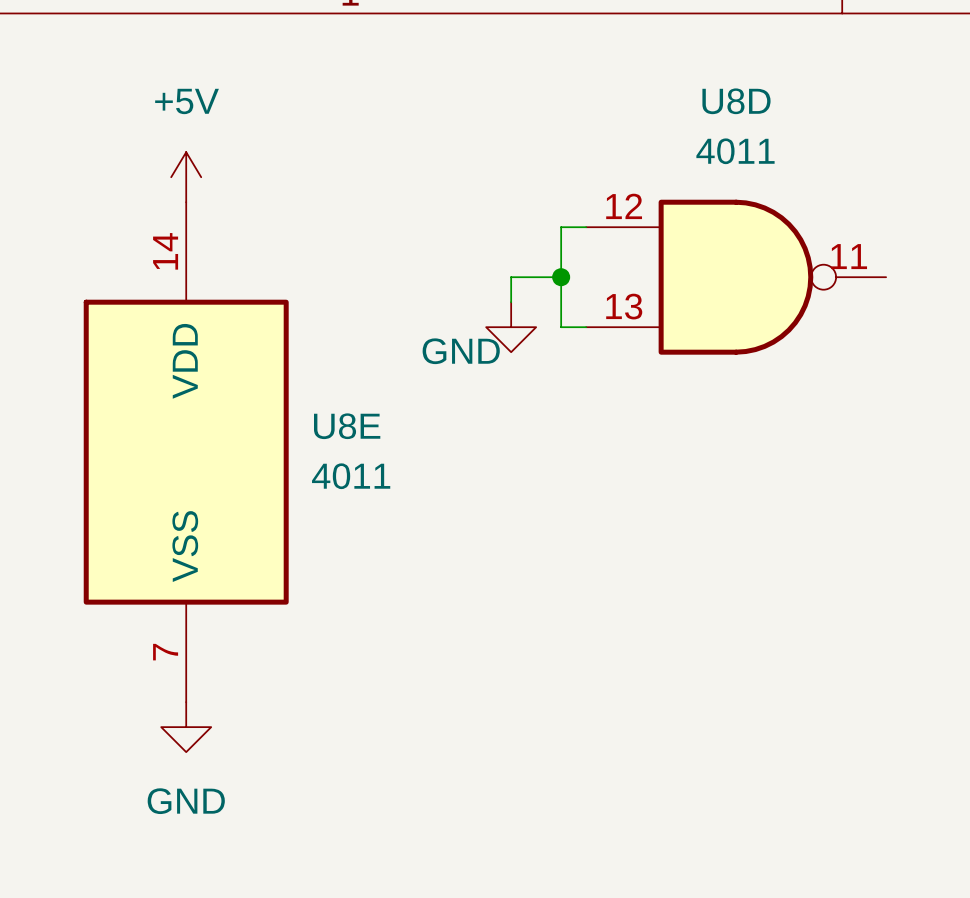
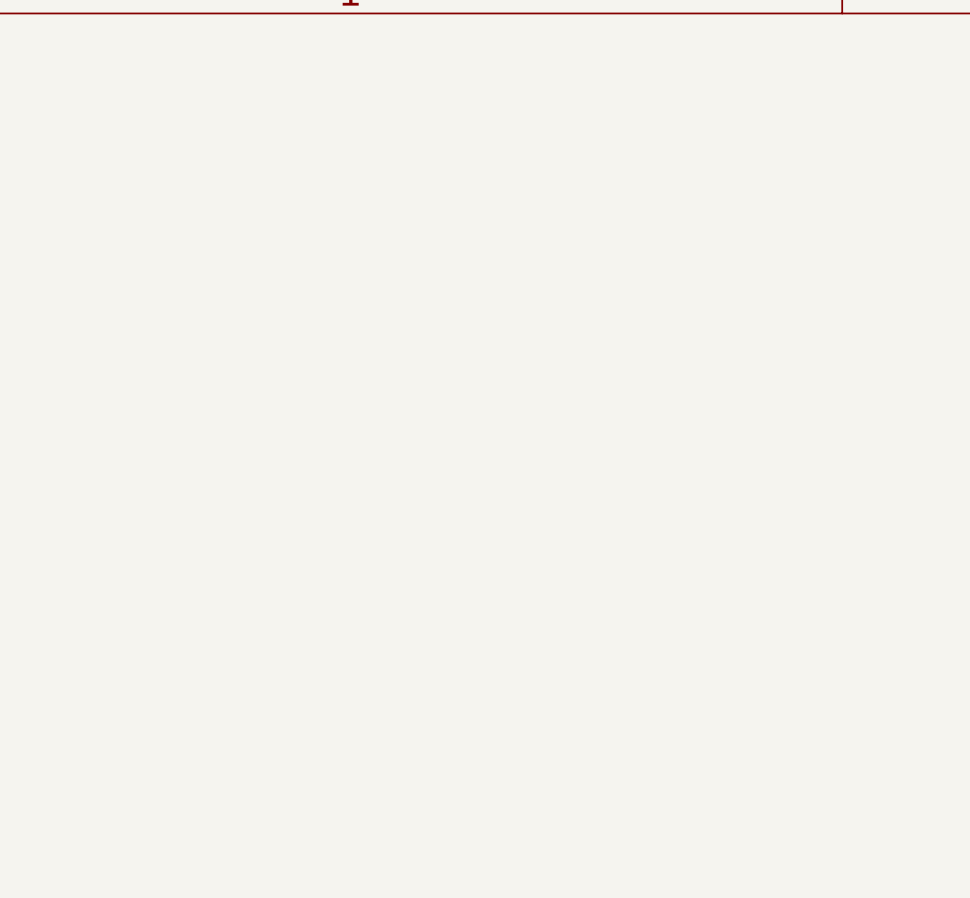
power symbol: +5V (186, 177) -> none
wire: (586, 227) (561, 227) (561, 327) (586, 327) -> none
wire: (561, 277) (511, 277) (511, 302) -> none
junction: (561, 277) -> none
U8D: 4011 (736, 277) -> none
power symbol: GND (511, 327) -> none
U8E: 4011 (186, 452) -> none
power symbol: GND (186, 727) -> none

